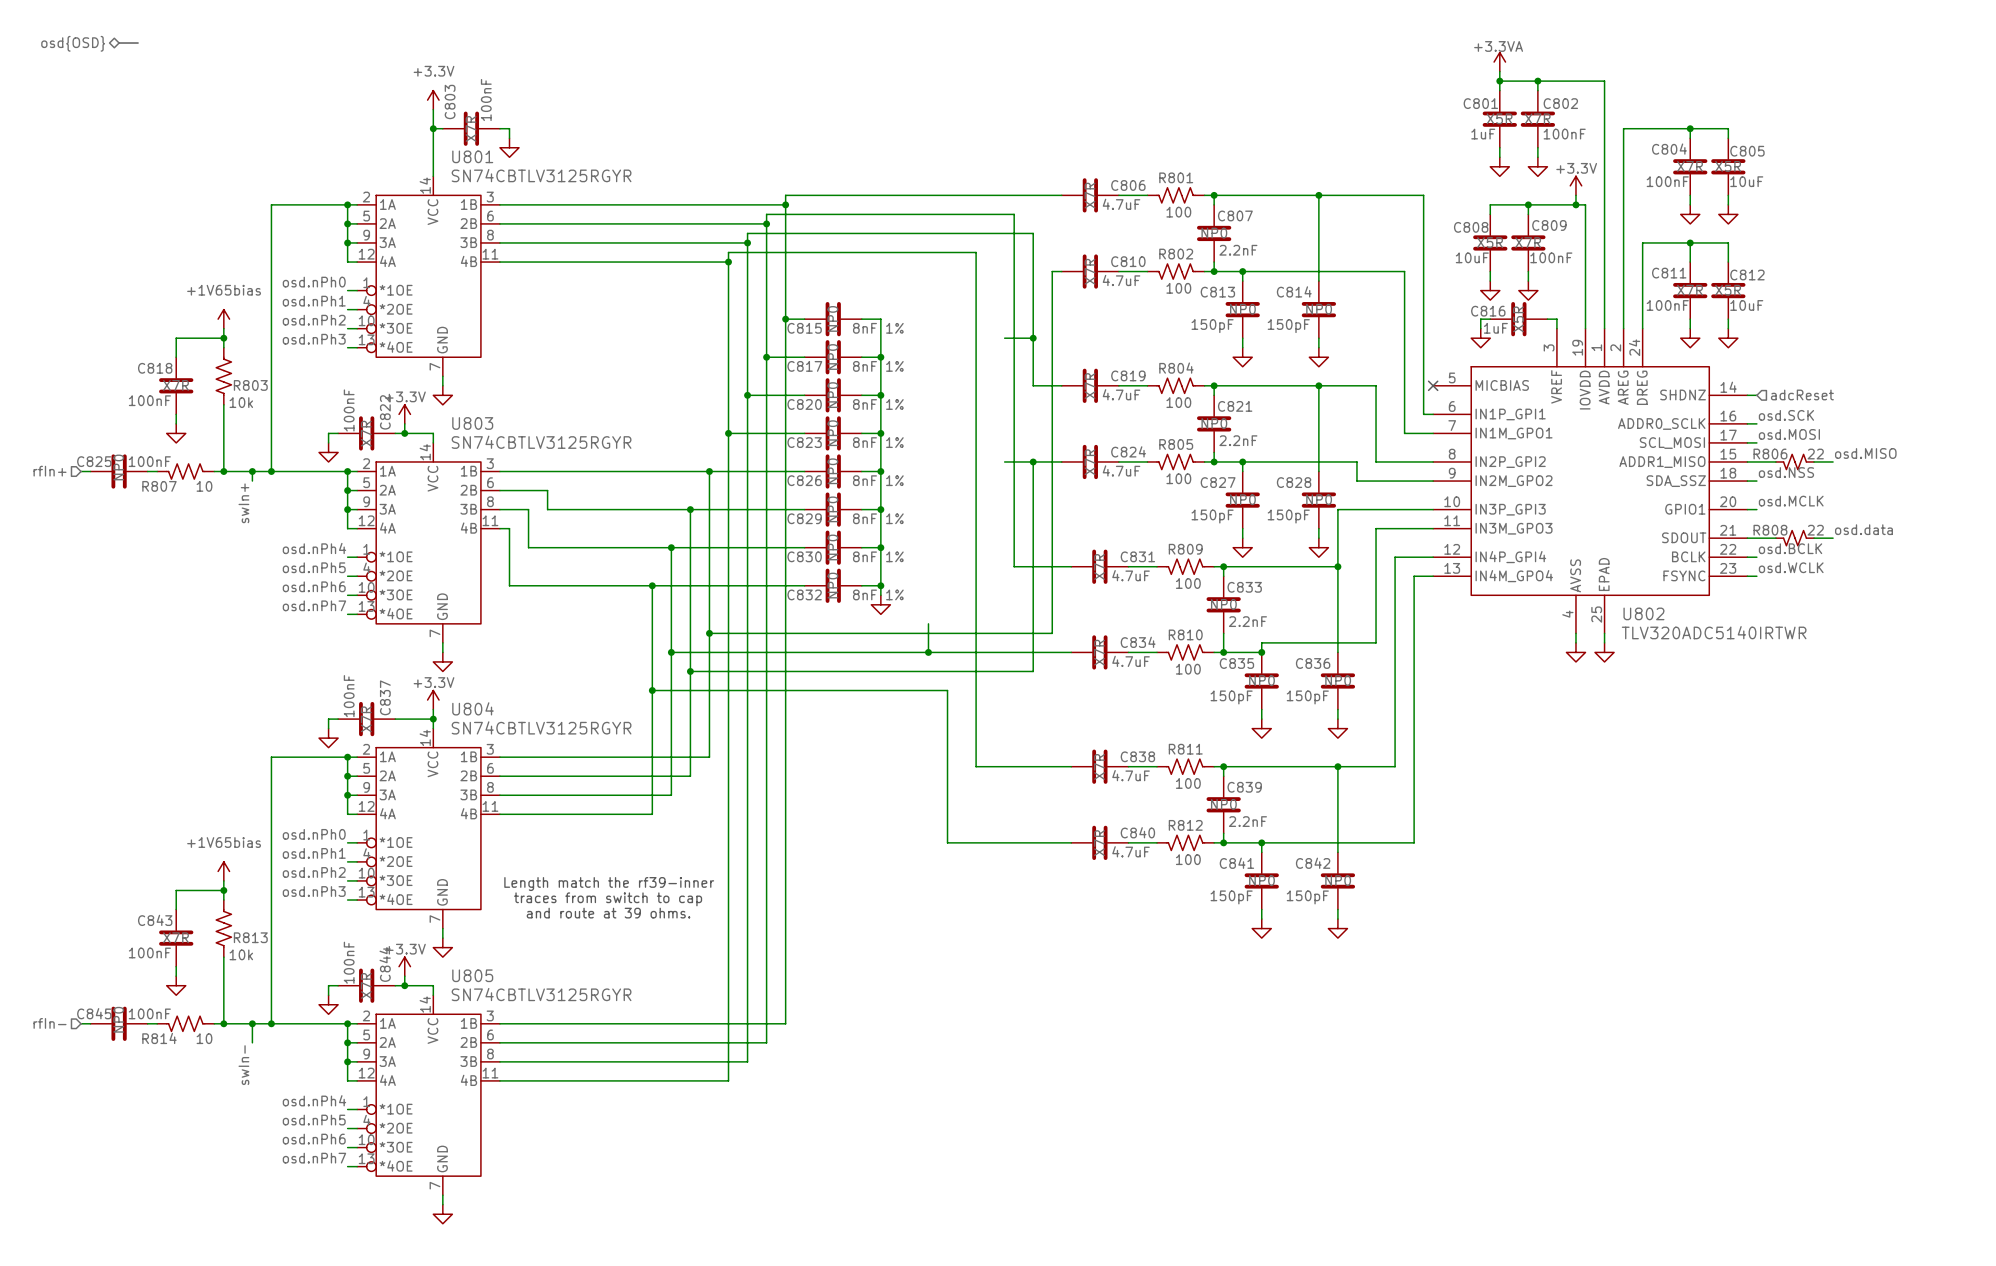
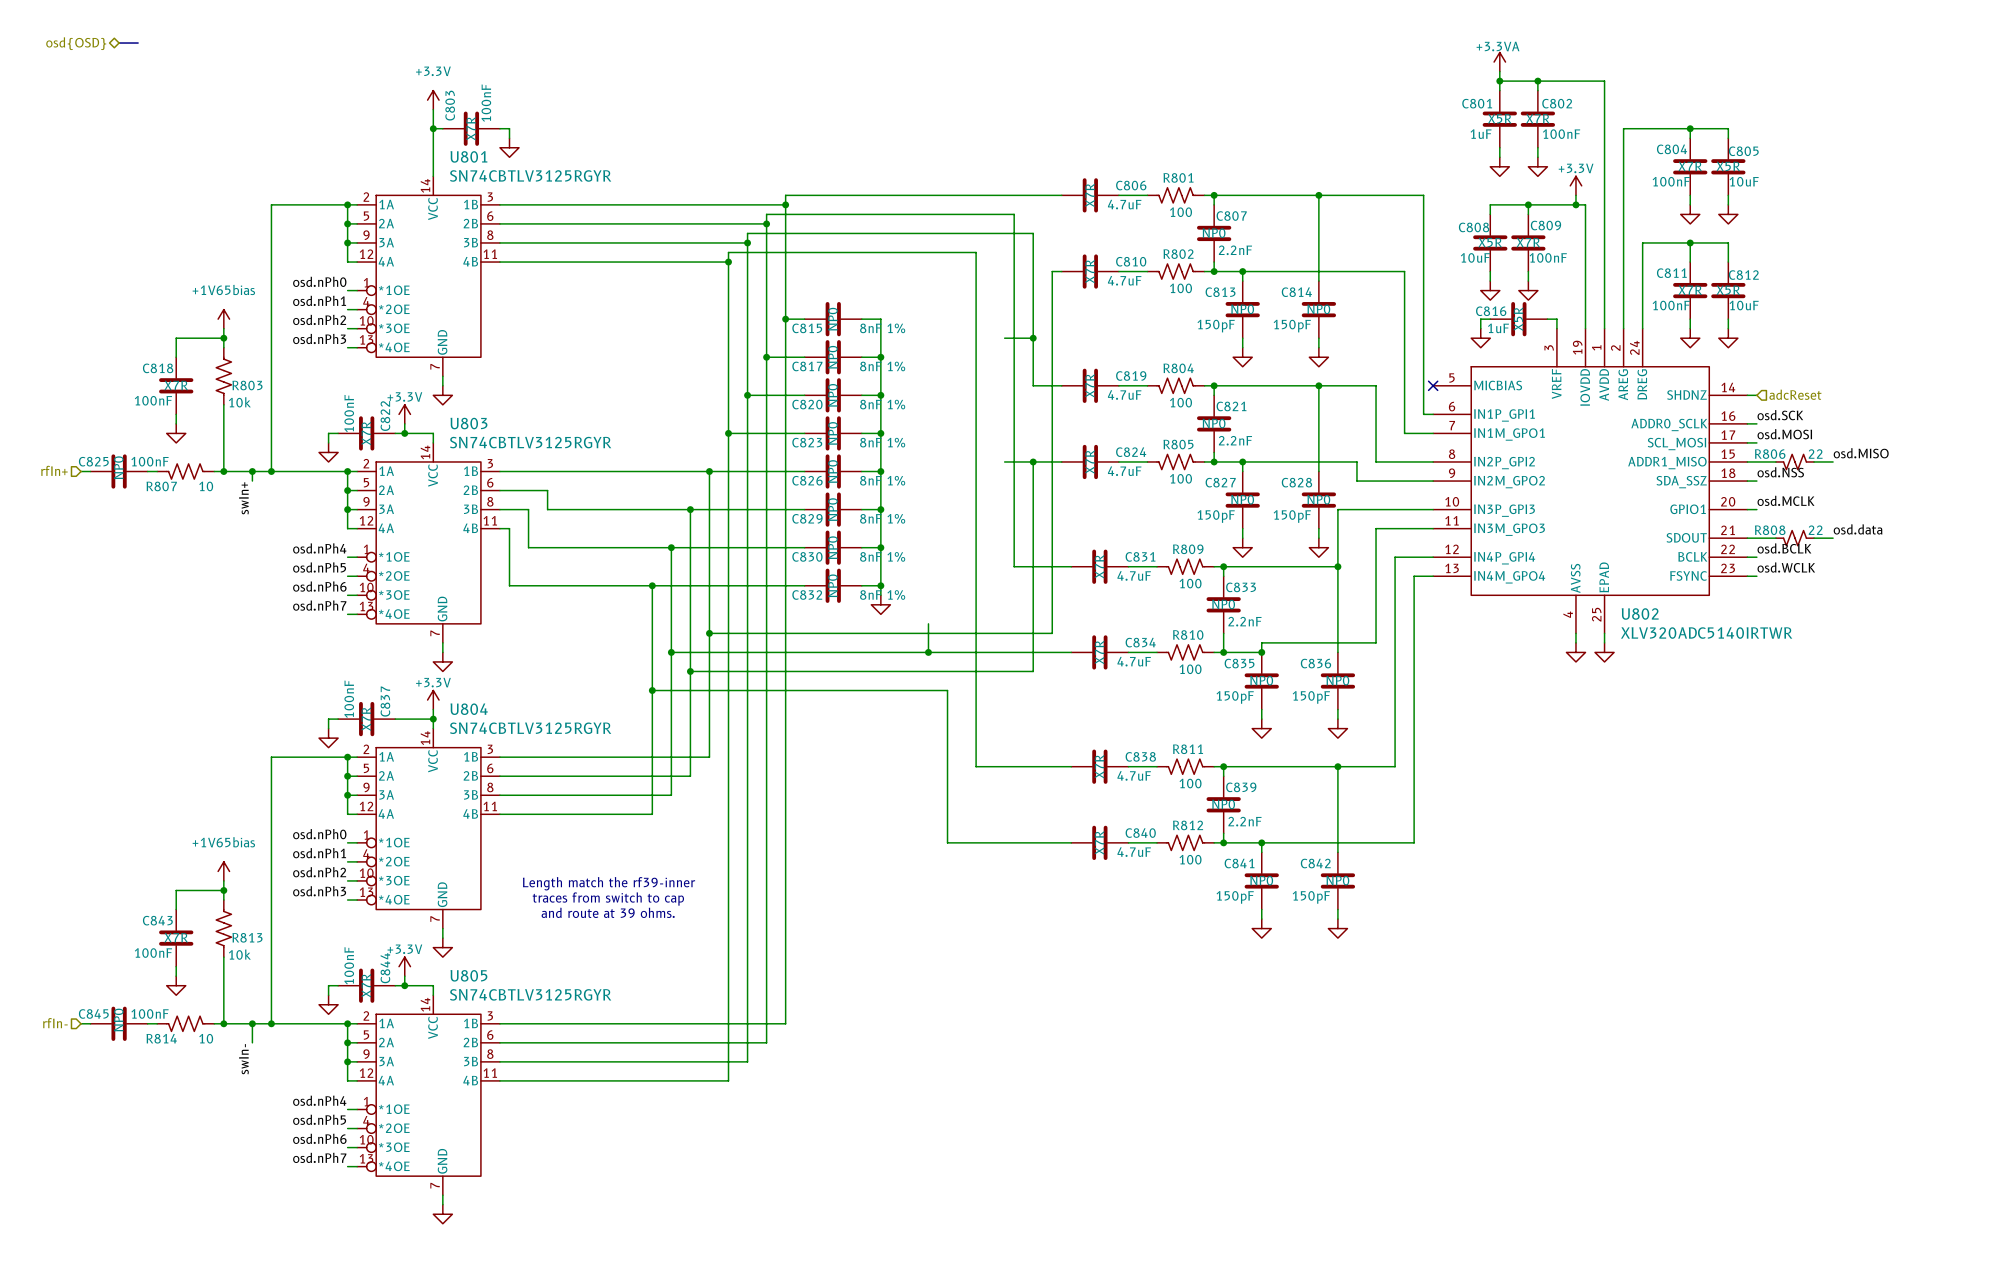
U802 value: TLV320ADC5140IRTWR (1714, 632) -> XLV320ADC5140IRTWR (1706, 633)

